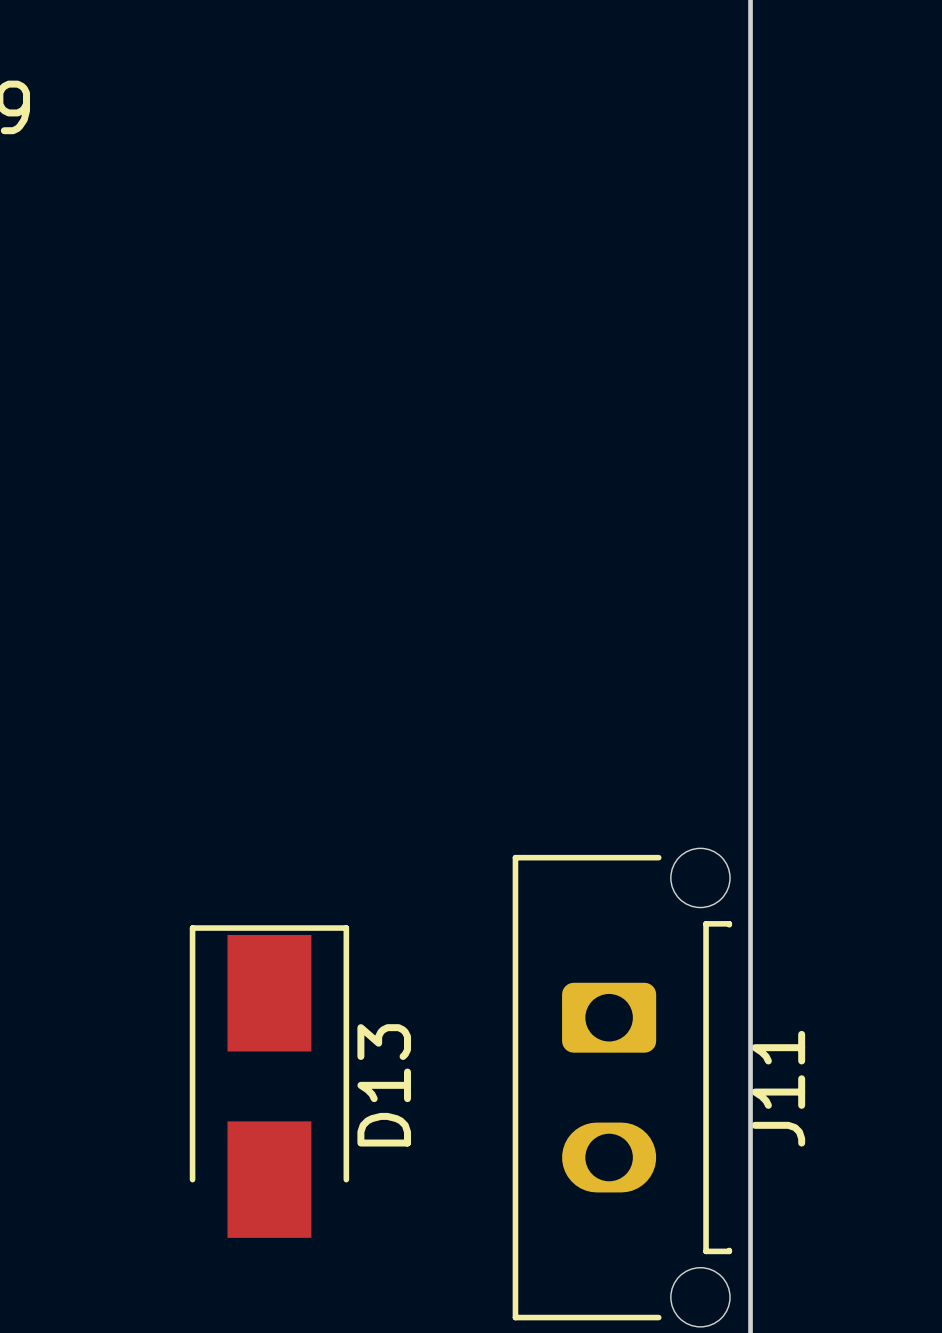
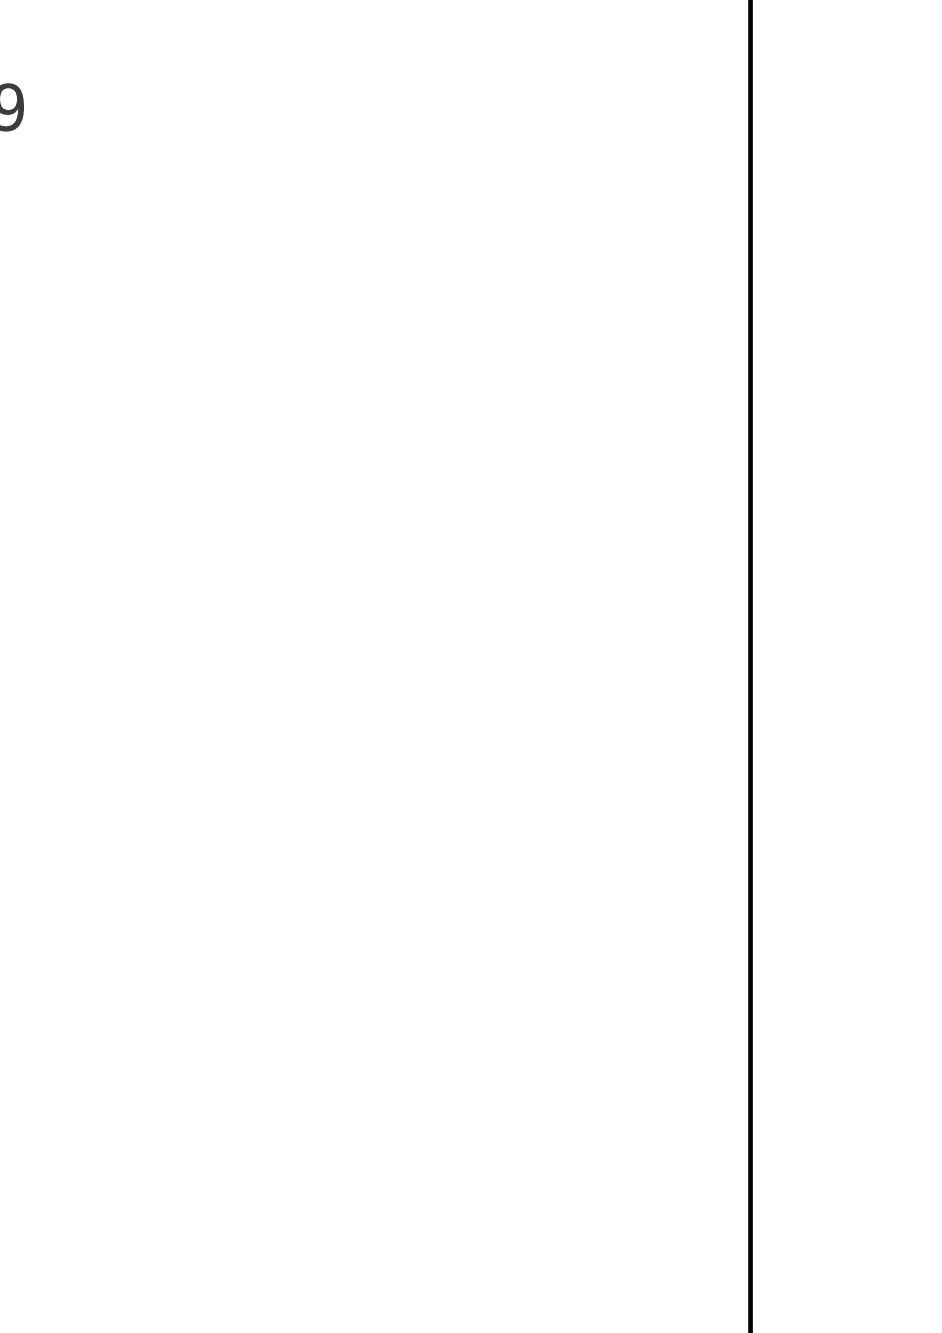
D13: (269, 1081) -> none
J11: (622, 1087) -> none

